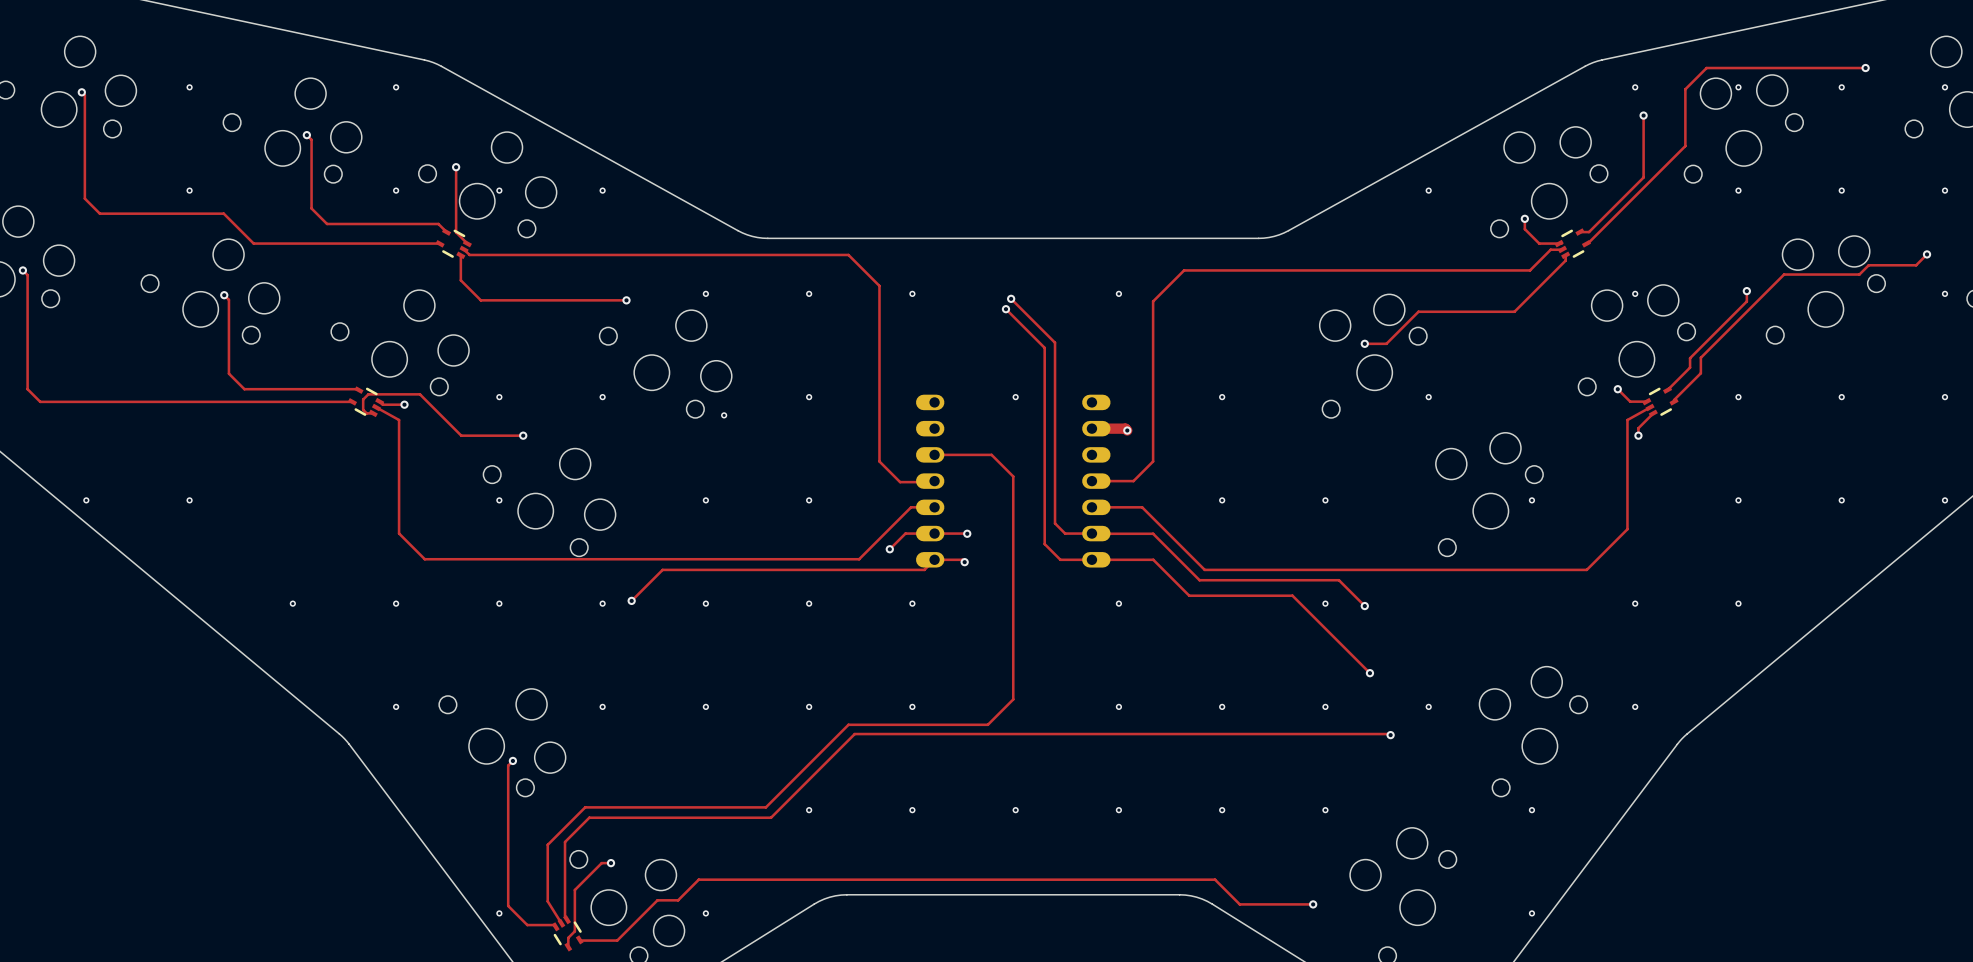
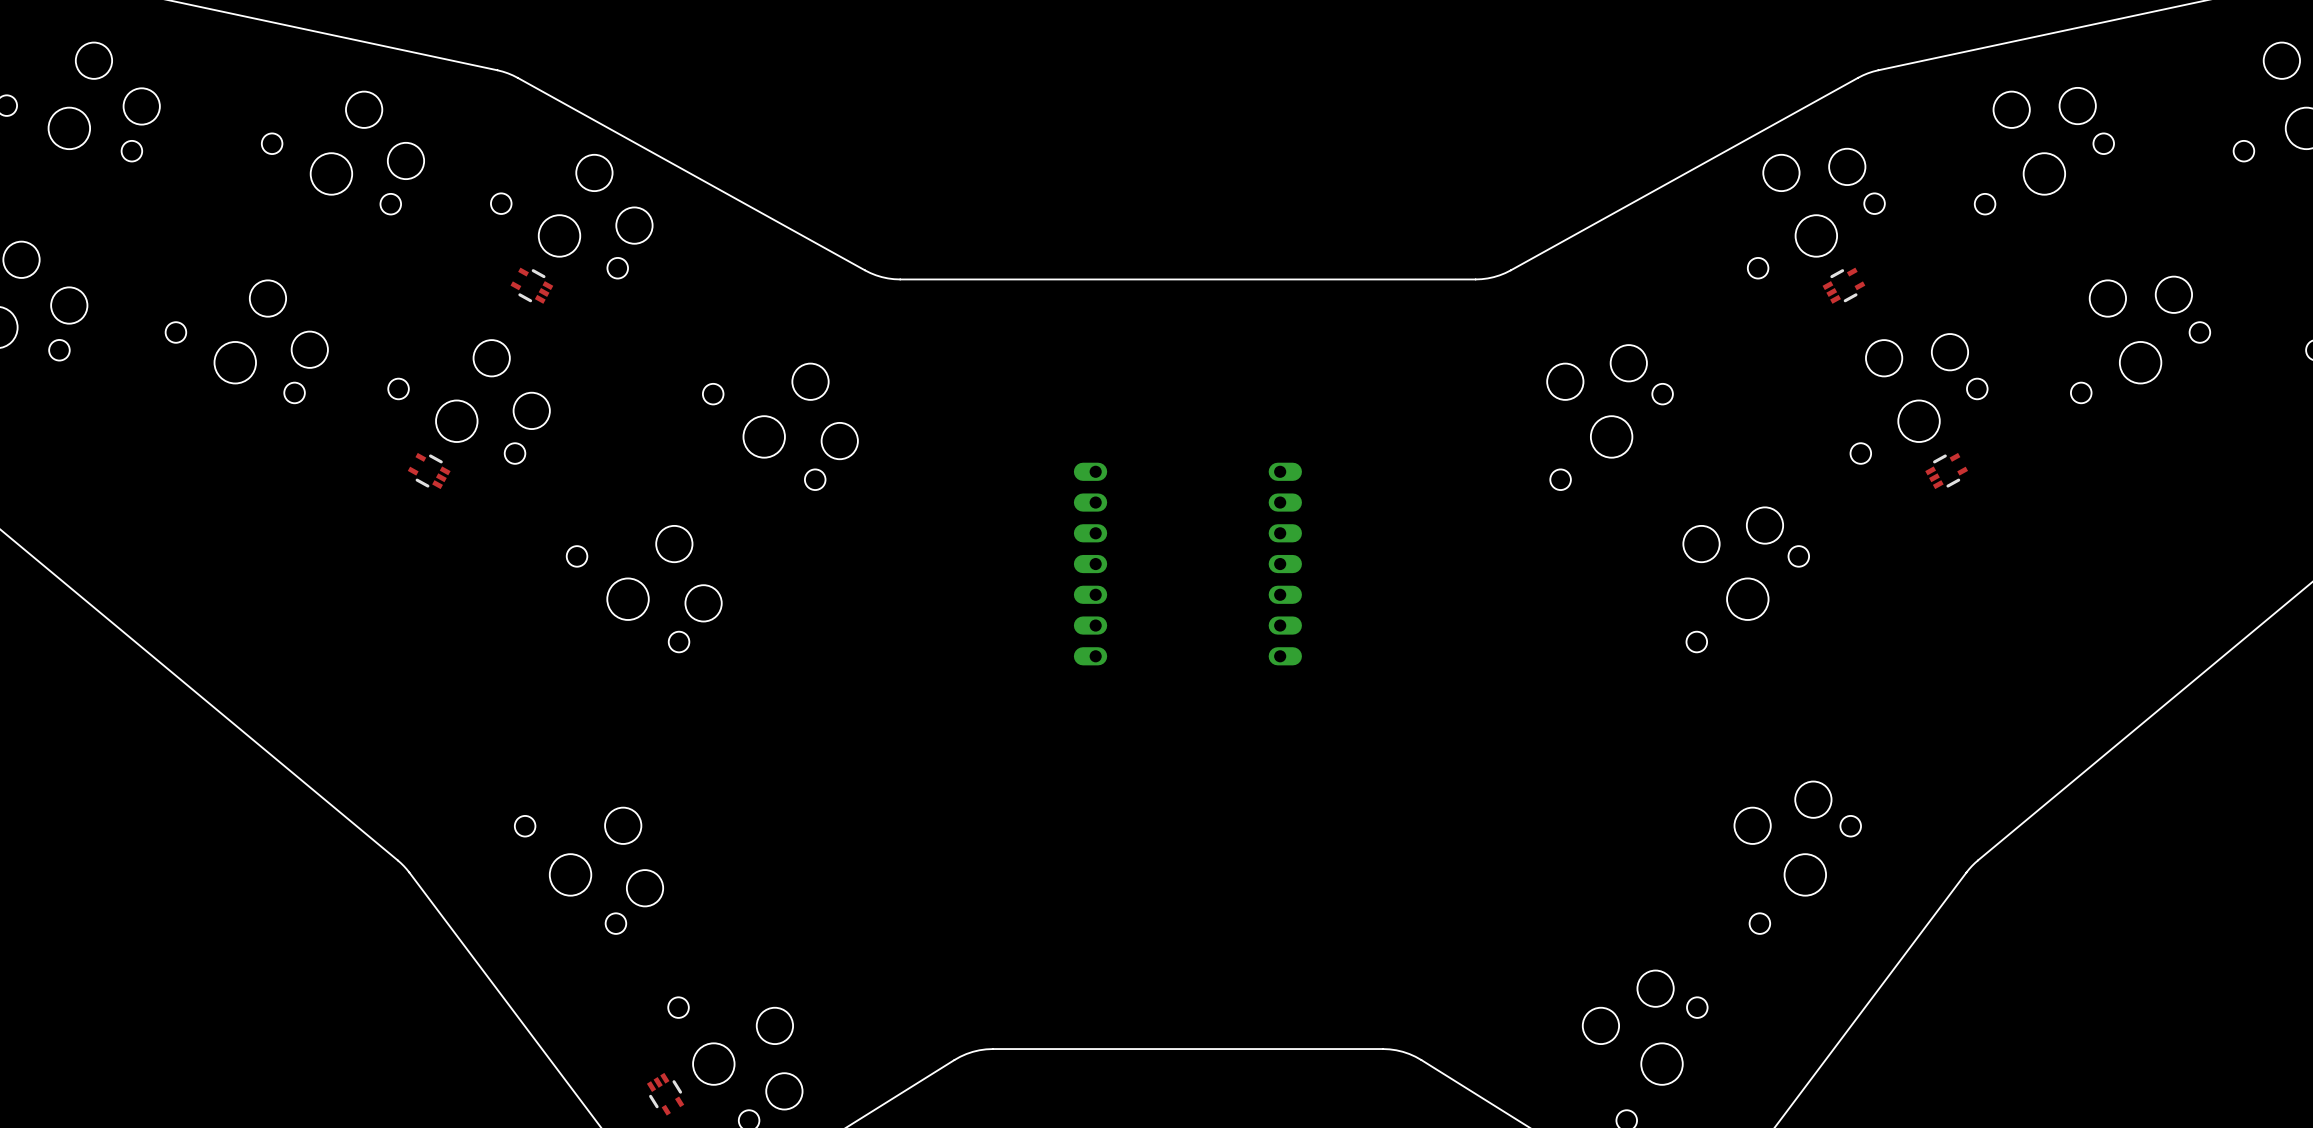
track: (1865, 68) (1706, 68) (1685, 89) (1685, 146) (1586, 243) -> none
via: (1865, 68) -> none
via: (189, 87) -> none
via: (396, 87) -> none
via: (1635, 87) -> none
via: (1738, 87) -> none
via: (1841, 87) -> none
via: (1944, 87) -> none
track: (81, 92) (84, 95) (84, 198) (99, 213) (223, 213) (253, 243) (440, 243) -> none
via: (81, 92) -> none
track: (1643, 115) (1643, 177) (1589, 232) (1579, 232) -> none
via: (1643, 115) -> none
track: (306, 135) (311, 139) (311, 208) (327, 223) (438, 223) (446, 232) -> none
via: (306, 135) -> none
track: (456, 167) (456, 232) (467, 243) -> none
via: (456, 167) -> none
via: (189, 190) -> none
via: (396, 190) -> none
via: (499, 190) -> none
via: (602, 190) -> none
via: (1428, 190) -> none
via: (1738, 190) -> none
via: (1841, 190) -> none
via: (1944, 190) -> none
track: (1524, 218) (1524, 229) (1539, 243) (1561, 243) (1559, 243) -> none
via: (1524, 218) -> none
track: (464, 249) (469, 254) (848, 254) (879, 285) (879, 461) (900, 482) (934, 481) -> none
track: (1562, 249) (1550, 249) (1530, 270) (1184, 270) (1153, 301) (1153, 461) (1133, 481) (1091, 481) -> none
track: (1927, 254) (1916, 265) (1868, 265) (1859, 274) (1784, 274) (1700, 357) (1700, 373) (1674, 401) -> none
via: (1927, 254) -> none
track: (460, 255) (460, 280) (480, 300) (626, 300) -> none
track: (1565, 255) (1565, 260) (1514, 311) (1418, 311) (1386, 343) (1364, 343) -> none
track: (22, 270) (27, 275) (27, 389) (40, 401) (352, 401) -> none
via: (22, 270) -> none
track: (1746, 291) (1746, 301) (1690, 358) (1690, 367) (1667, 390) (1669, 388) -> none
via: (1746, 291) -> none
via: (705, 293) -> none
via: (809, 293) -> none
via: (912, 293) -> none
via: (1118, 293) -> none
via: (1635, 293) -> none
via: (1944, 293) -> none
track: (224, 295) (228, 299) (228, 373) (244, 389) (358, 390) -> none
via: (224, 295) -> none
track: (1011, 298) (1055, 342) (1055, 523) (1065, 533) (1153, 533) (1199, 580) (1338, 580) (1364, 606) -> none
via: (1011, 298) -> none
via: (626, 300) -> none
track: (1005, 309) (1044, 347) (1044, 544) (1060, 559) (1153, 559) (1189, 595) (1292, 595) (1369, 673) -> none
via: (1005, 309) -> none
via: (1364, 343) -> none
track: (1617, 389) (1630, 401) (1646, 401) -> none
via: (1617, 389) -> none
via: (499, 397) -> none
via: (602, 397) -> none
via: (809, 397) -> none
via: (1015, 397) -> none
via: (1222, 397) -> none
via: (1428, 397) -> none
via: (1738, 397) -> none
via: (1841, 397) -> none
via: (1944, 397) -> none
track: (379, 401) (382, 404) (404, 404) -> none
via: (404, 404) -> none
track: (376, 407) (399, 420) (399, 533) (424, 559) (859, 559) (911, 507) (934, 507) -> none
track: (1650, 407) (1627, 420) (1627, 529) (1586, 569) (1204, 569) (1142, 507) (1091, 507) -> none
track: (373, 413) (366, 413) (363, 409) (363, 399) (368, 394) (419, 394) (461, 435) (523, 435) -> none
track: (1653, 413) (1638, 428) (1638, 435) -> none
via: (724, 415) -> none
track: (1091, 428) (1125, 428) (1127, 430) -> none
via: (1127, 430) -> none
via: (523, 435) -> none
via: (1638, 435) -> none
track: (934, 454) (991, 454) (1013, 476) (1013, 699) (987, 724) (848, 724) (765, 807) (585, 807) (547, 844) (547, 901) (561, 923) -> none
via: (86, 500) -> none
via: (189, 500) -> none
via: (499, 500) -> none
via: (705, 500) -> none
via: (809, 500) -> none
via: (1222, 500) -> none
via: (1325, 500) -> none
via: (1531, 500) -> none
via: (1738, 500) -> none
via: (1841, 500) -> none
via: (1944, 500) -> none
track: (967, 533) (905, 533) (889, 549) -> none
via: (967, 533) -> none
via: (889, 549) -> none
track: (964, 562) (962, 559) (934, 559) (924, 569) (662, 569) (631, 600) -> none
via: (964, 562) -> none
via: (631, 600) -> none
via: (292, 603) -> none
via: (396, 603) -> none
via: (499, 603) -> none
via: (602, 603) -> none
via: (705, 603) -> none
via: (809, 603) -> none
via: (912, 603) -> none
via: (1118, 603) -> none
via: (1325, 603) -> none
via: (1635, 603) -> none
via: (1738, 603) -> none
via: (1364, 606) -> none
via: (1369, 673) -> none
via: (396, 706) -> none
via: (602, 706) -> none
via: (705, 706) -> none
via: (809, 706) -> none
via: (912, 706) -> none
via: (1118, 706) -> none
via: (1222, 706) -> none
via: (1325, 706) -> none
via: (1428, 706) -> none
via: (1635, 706) -> none
track: (1390, 735) (854, 734) (771, 817) (589, 817) (565, 842) (565, 917) (567, 919) -> none
via: (1390, 735) -> none
track: (512, 760) (508, 765) (508, 905) (527, 925) (553, 925) (555, 926) -> none
via: (512, 760) -> none
via: (809, 810) -> none
via: (912, 810) -> none
via: (1015, 810) -> none
via: (1118, 810) -> none
via: (1222, 810) -> none
via: (1325, 810) -> none
via: (1531, 810) -> none
track: (611, 863) (601, 863) (574, 890) (574, 931) (568, 937) (568, 946) -> none
via: (611, 863) -> none
track: (1313, 904) (1239, 904) (1215, 879) (698, 879) (678, 900) (657, 900) (617, 940) (579, 939) -> none
via: (1313, 904) -> none
via: (499, 913) -> none
via: (705, 913) -> none
via: (1531, 913) -> none

